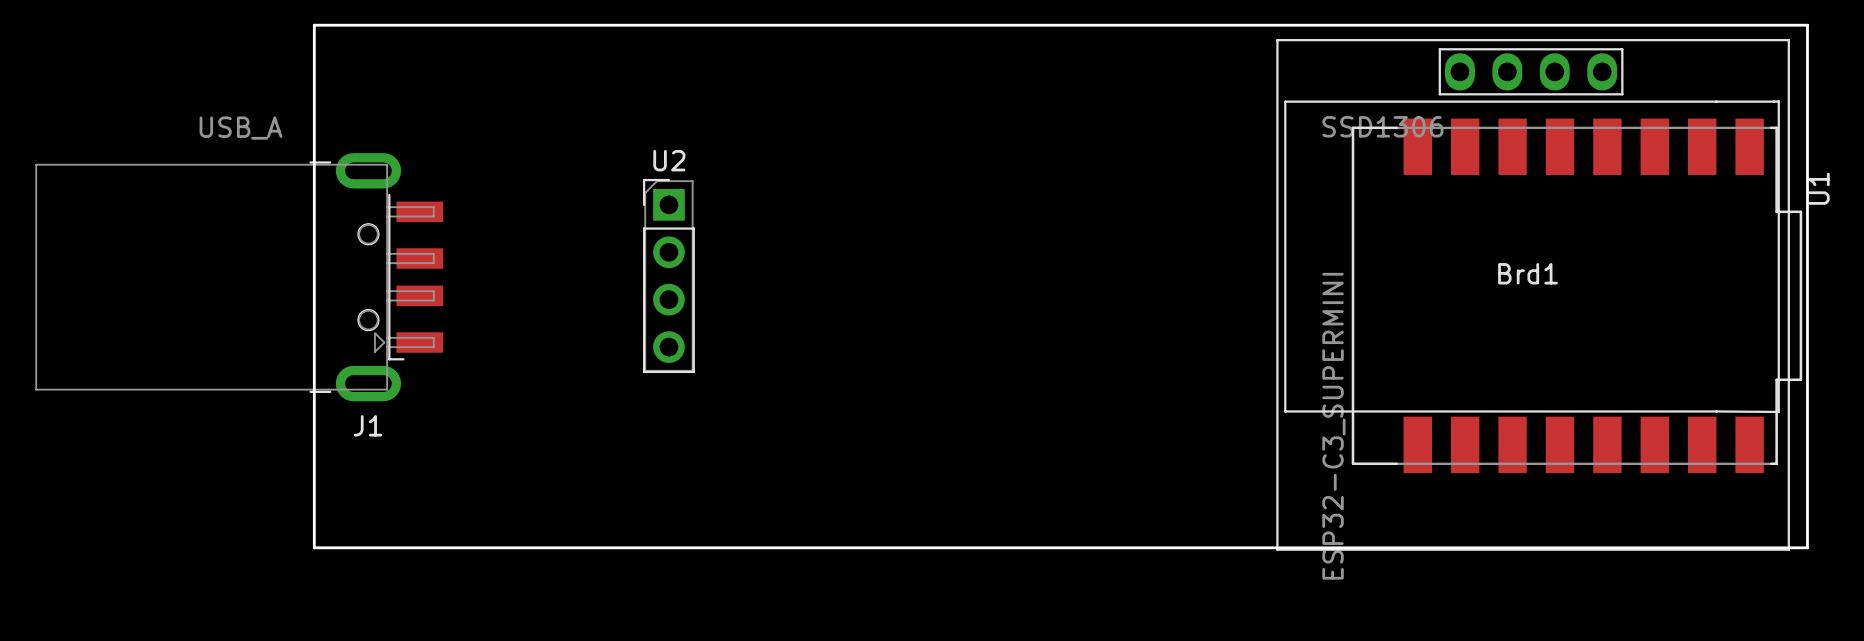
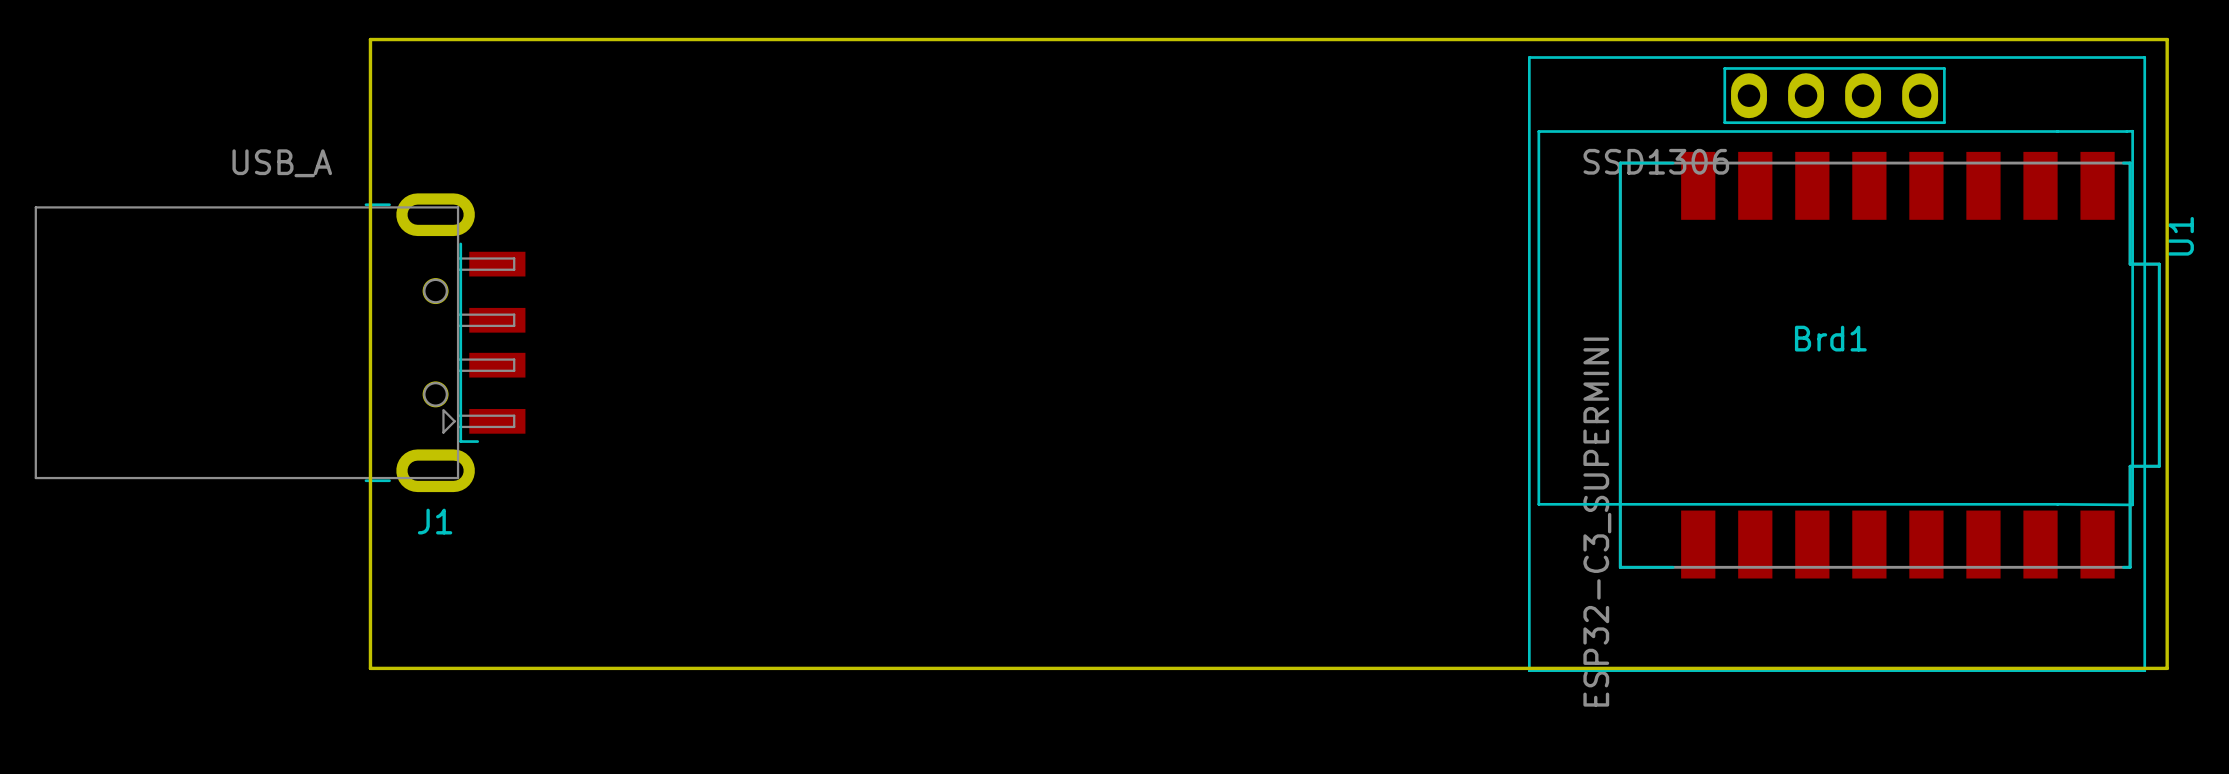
U2: (668, 275) -> none

